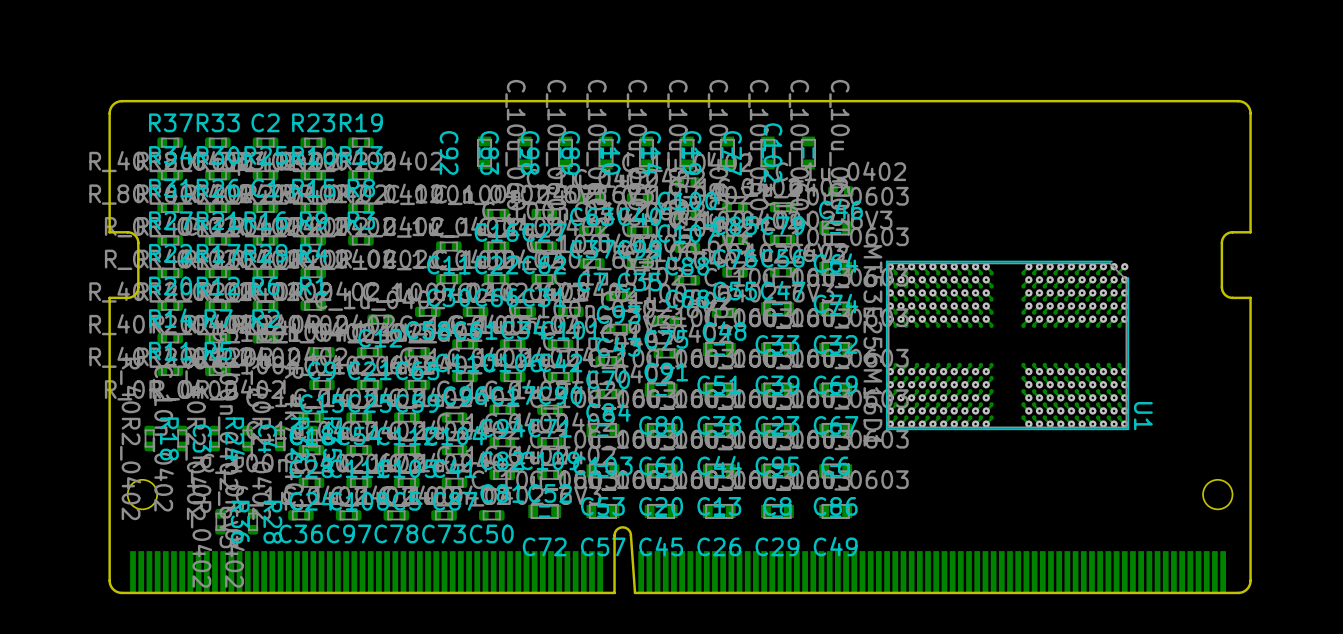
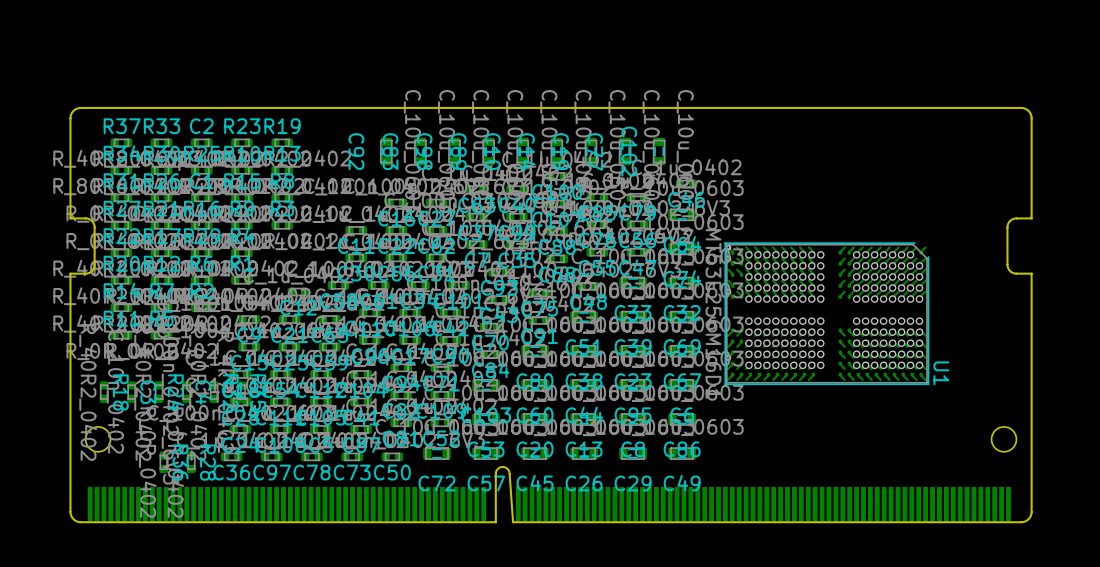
via: (900, 266) -> none
via: (911, 266) -> none
via: (922, 266) -> none
via: (932, 266) -> none
via: (943, 266) -> none
via: (954, 266) -> none
via: (964, 266) -> none
via: (975, 266) -> none
via: (986, 266) -> none
via: (1028, 266) -> none
via: (1039, 266) -> none
via: (1050, 266) -> none
via: (1060, 266) -> none
via: (1071, 266) -> none
via: (1082, 266) -> none
via: (1092, 266) -> none
via: (1103, 266) -> none
via: (1114, 266) -> none
via: (1124, 266) -> none
via: none -> (748, 254)
via: none -> (757, 254)
via: none -> (766, 254)
via: none -> (775, 254)
via: none -> (784, 254)
via: none -> (793, 254)
via: none -> (802, 254)
via: none -> (811, 254)
via: none -> (820, 254)
via: none -> (856, 254)
via: none -> (865, 254)
via: none -> (874, 254)
via: none -> (883, 254)
via: none -> (892, 254)
via: none -> (901, 254)
via: none -> (910, 254)
via: (900, 279) -> none
via: (911, 279) -> none
via: (922, 279) -> none
via: (932, 279) -> none
via: (943, 279) -> none
via: (954, 279) -> none
via: (964, 279) -> none
via: (975, 279) -> none
via: (986, 279) -> none
via: (1028, 279) -> none
via: (1039, 279) -> none
via: (1050, 279) -> none
via: (1060, 279) -> none
via: (1071, 279) -> none
via: (1082, 279) -> none
via: (1092, 279) -> none
via: (1103, 279) -> none
via: (1114, 279) -> none
via: (1124, 279) -> none
via: none -> (748, 265)
via: none -> (757, 265)
via: none -> (766, 265)
via: none -> (775, 265)
via: none -> (784, 265)
via: none -> (793, 265)
via: none -> (802, 265)
via: none -> (811, 265)
via: none -> (820, 265)
via: none -> (856, 265)
via: none -> (865, 265)
via: none -> (874, 265)
via: none -> (883, 265)
via: none -> (892, 265)
via: none -> (901, 265)
via: none -> (910, 265)
via: none -> (919, 265)
via: (890, 292) -> none
via: (900, 292) -> none
via: (911, 292) -> none
via: (922, 292) -> none
via: (932, 292) -> none
via: (943, 292) -> none
via: (954, 292) -> none
via: (964, 292) -> none
via: (975, 292) -> none
via: (986, 292) -> none
via: (1028, 292) -> none
via: (1039, 292) -> none
via: (1050, 292) -> none
via: (1060, 292) -> none
via: (1071, 292) -> none
via: (1082, 292) -> none
via: (1092, 292) -> none
via: (1103, 292) -> none
via: (1114, 292) -> none
via: (1124, 292) -> none
via: none -> (748, 276)
via: none -> (757, 276)
via: none -> (766, 276)
via: none -> (775, 276)
via: none -> (784, 276)
via: none -> (793, 276)
via: none -> (802, 276)
via: none -> (811, 276)
via: none -> (820, 276)
via: none -> (856, 276)
via: none -> (865, 276)
via: none -> (874, 276)
via: none -> (883, 276)
via: none -> (892, 276)
via: none -> (901, 276)
via: none -> (910, 276)
via: none -> (919, 276)
via: (890, 306) -> none
via: (900, 306) -> none
via: (911, 306) -> none
via: (922, 306) -> none
via: (932, 306) -> none
via: (943, 306) -> none
via: (954, 306) -> none
via: (964, 306) -> none
via: (975, 306) -> none
via: (986, 306) -> none
via: (1028, 306) -> none
via: (1039, 306) -> none
via: (1050, 306) -> none
via: (1060, 306) -> none
via: (1071, 306) -> none
via: (1082, 306) -> none
via: (1092, 306) -> none
via: (1103, 306) -> none
via: (1114, 306) -> none
via: (1124, 306) -> none
via: none -> (748, 288)
via: none -> (757, 288)
via: none -> (766, 288)
via: none -> (775, 288)
via: none -> (784, 288)
via: none -> (793, 288)
via: none -> (802, 288)
via: none -> (811, 288)
via: none -> (820, 288)
via: none -> (856, 288)
via: none -> (865, 288)
via: none -> (874, 288)
via: none -> (883, 288)
via: none -> (892, 288)
via: none -> (901, 288)
via: none -> (910, 288)
via: none -> (919, 288)
via: (900, 319) -> none
via: (911, 319) -> none
via: (922, 319) -> none
via: (932, 319) -> none
via: (943, 319) -> none
via: (954, 319) -> none
via: (964, 319) -> none
via: (975, 319) -> none
via: (986, 319) -> none
via: (1028, 319) -> none
via: (1039, 319) -> none
via: (1050, 319) -> none
via: (1060, 319) -> none
via: (1071, 319) -> none
via: (1082, 319) -> none
via: (1092, 319) -> none
via: (1103, 319) -> none
via: (1114, 319) -> none
via: (1124, 319) -> none
via: none -> (748, 299)
via: none -> (757, 299)
via: none -> (766, 299)
via: none -> (775, 299)
via: none -> (784, 299)
via: none -> (793, 299)
via: none -> (802, 299)
via: none -> (811, 299)
via: none -> (820, 299)
via: none -> (856, 299)
via: none -> (865, 299)
via: none -> (874, 299)
via: none -> (883, 299)
via: none -> (892, 299)
via: none -> (901, 299)
via: none -> (910, 299)
via: none -> (919, 299)
via: none -> (748, 321)
via: none -> (757, 321)
via: none -> (766, 321)
via: none -> (775, 321)
via: none -> (784, 321)
via: none -> (793, 321)
via: none -> (802, 321)
via: none -> (811, 321)
via: none -> (820, 321)
via: none -> (856, 321)
via: none -> (865, 321)
via: none -> (874, 321)
via: none -> (883, 321)
via: none -> (892, 321)
via: none -> (901, 321)
via: none -> (910, 321)
via: none -> (919, 321)
track: (916, 365) (911, 371) -> none
via: none -> (748, 332)
via: none -> (757, 332)
via: none -> (766, 332)
via: none -> (775, 332)
via: none -> (784, 332)
via: none -> (793, 332)
via: none -> (802, 332)
via: none -> (811, 332)
via: none -> (820, 332)
via: none -> (856, 332)
via: none -> (865, 332)
via: none -> (874, 332)
via: none -> (883, 332)
via: none -> (892, 332)
via: none -> (901, 332)
via: none -> (910, 332)
via: none -> (919, 332)
via: (890, 371) -> none
via: (900, 371) -> none
via: (911, 371) -> none
via: (922, 371) -> none
via: (932, 371) -> none
via: (943, 371) -> none
via: (954, 371) -> none
via: (964, 371) -> none
via: (975, 371) -> none
via: (986, 371) -> none
via: (1028, 371) -> none
via: (1039, 371) -> none
via: (1050, 371) -> none
via: (1060, 371) -> none
via: (1071, 371) -> none
via: (1082, 371) -> none
via: (1092, 371) -> none
via: (1103, 371) -> none
via: (1114, 371) -> none
via: (1124, 371) -> none
via: none -> (748, 343)
via: none -> (757, 343)
via: none -> (766, 343)
via: none -> (775, 343)
via: none -> (784, 343)
via: none -> (793, 343)
via: none -> (802, 343)
via: none -> (811, 343)
via: none -> (820, 343)
via: none -> (856, 343)
via: none -> (865, 343)
via: none -> (874, 343)
via: none -> (883, 343)
via: none -> (892, 343)
via: none -> (901, 343)
via: none -> (910, 343)
via: none -> (919, 343)
via: (890, 384) -> none
via: (900, 384) -> none
via: (911, 384) -> none
via: (922, 384) -> none
via: (932, 384) -> none
via: (943, 384) -> none
via: (954, 384) -> none
via: (964, 384) -> none
via: (975, 384) -> none
via: (986, 384) -> none
via: (1028, 384) -> none
via: (1039, 384) -> none
via: (1050, 384) -> none
via: (1060, 384) -> none
via: (1071, 384) -> none
via: (1082, 384) -> none
via: (1092, 384) -> none
via: (1103, 384) -> none
via: (1114, 384) -> none
via: (1124, 384) -> none
via: none -> (748, 354)
via: none -> (757, 354)
via: none -> (766, 354)
via: none -> (775, 354)
via: none -> (784, 354)
via: none -> (793, 354)
via: none -> (802, 354)
via: none -> (811, 354)
via: none -> (820, 354)
via: none -> (856, 354)
via: none -> (865, 354)
via: none -> (874, 354)
via: none -> (883, 354)
via: none -> (892, 354)
via: none -> (901, 354)
via: none -> (910, 354)
via: none -> (919, 354)
via: (900, 397) -> none
via: (911, 397) -> none
via: (922, 397) -> none
via: (932, 397) -> none
via: (943, 397) -> none
via: (954, 397) -> none
via: (964, 397) -> none
via: (975, 397) -> none
via: (986, 397) -> none
via: (1028, 397) -> none
via: (1039, 397) -> none
via: (1050, 397) -> none
via: (1060, 397) -> none
via: (1071, 397) -> none
via: (1082, 397) -> none
via: (1092, 397) -> none
via: (1103, 397) -> none
via: (1114, 397) -> none
via: (1124, 397) -> none
via: none -> (748, 365)
via: none -> (757, 365)
via: none -> (766, 365)
via: none -> (775, 365)
via: none -> (784, 365)
via: none -> (793, 365)
via: none -> (802, 365)
via: none -> (811, 365)
via: none -> (820, 365)
via: none -> (856, 365)
via: none -> (865, 365)
via: none -> (874, 365)
via: none -> (883, 365)
via: none -> (892, 365)
via: none -> (901, 365)
via: none -> (910, 365)
via: none -> (919, 365)
via: (890, 410) -> none
via: (900, 410) -> none
via: (911, 410) -> none
via: (922, 410) -> none
via: (932, 410) -> none
via: (943, 410) -> none
via: (954, 410) -> none
via: (964, 410) -> none
via: (975, 410) -> none
via: (986, 410) -> none
via: (1028, 410) -> none
via: (1039, 410) -> none
via: (1050, 410) -> none
via: (1060, 410) -> none
via: (1071, 410) -> none
via: (1082, 410) -> none
via: (1092, 410) -> none
via: (1103, 410) -> none
via: (1114, 410) -> none
via: (1124, 410) -> none
via: (890, 424) -> none
via: (900, 424) -> none
via: (911, 424) -> none
via: (922, 424) -> none
via: (932, 424) -> none
via: (943, 424) -> none
via: (954, 424) -> none
via: (964, 424) -> none
via: (975, 424) -> none
via: (986, 424) -> none
via: (1028, 424) -> none
via: (1039, 424) -> none
via: (1050, 424) -> none
via: (1060, 424) -> none
via: (1071, 424) -> none
via: (1082, 424) -> none
via: (1092, 424) -> none
via: (1103, 424) -> none
via: (1114, 424) -> none
via: (1124, 424) -> none

